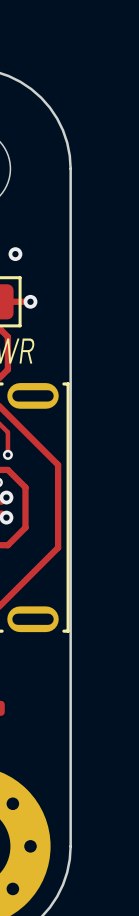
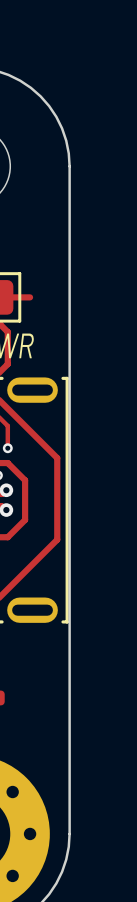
via: (15, 254) -> none
via: (30, 301) -> none

